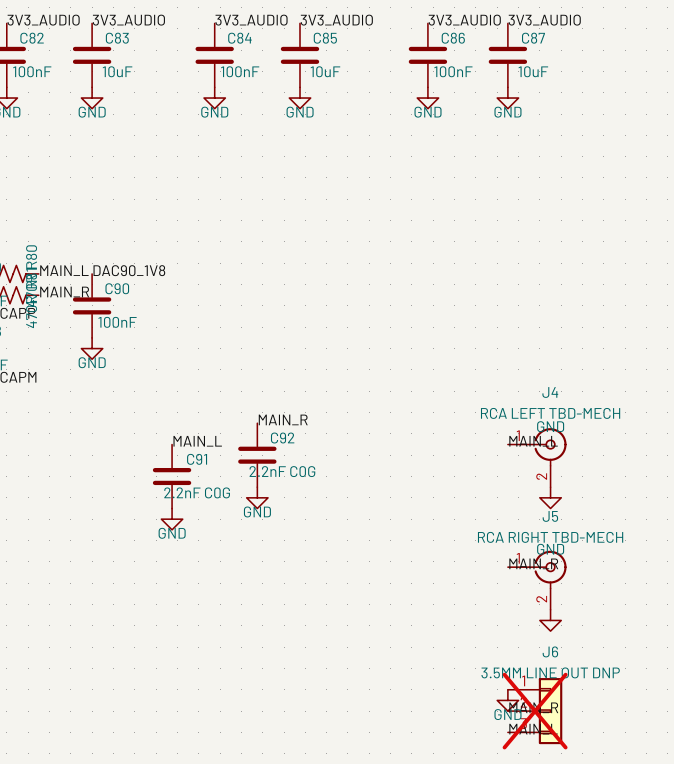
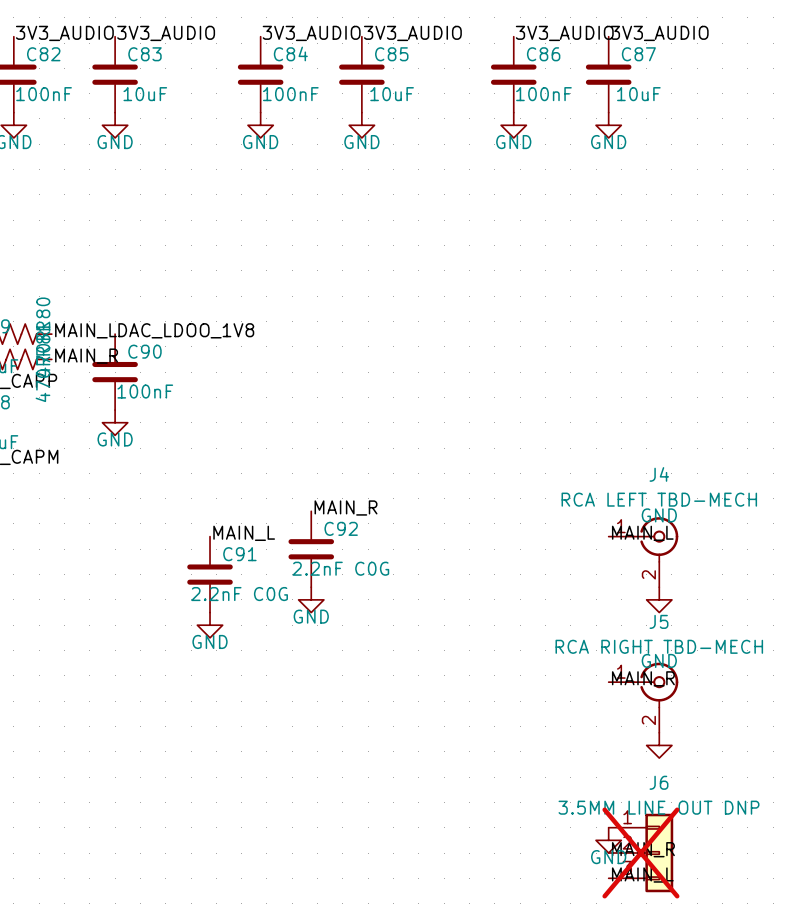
label: DAC90_1V8 (129, 270) -> DAC_LDOO_1V8 (186, 330)

